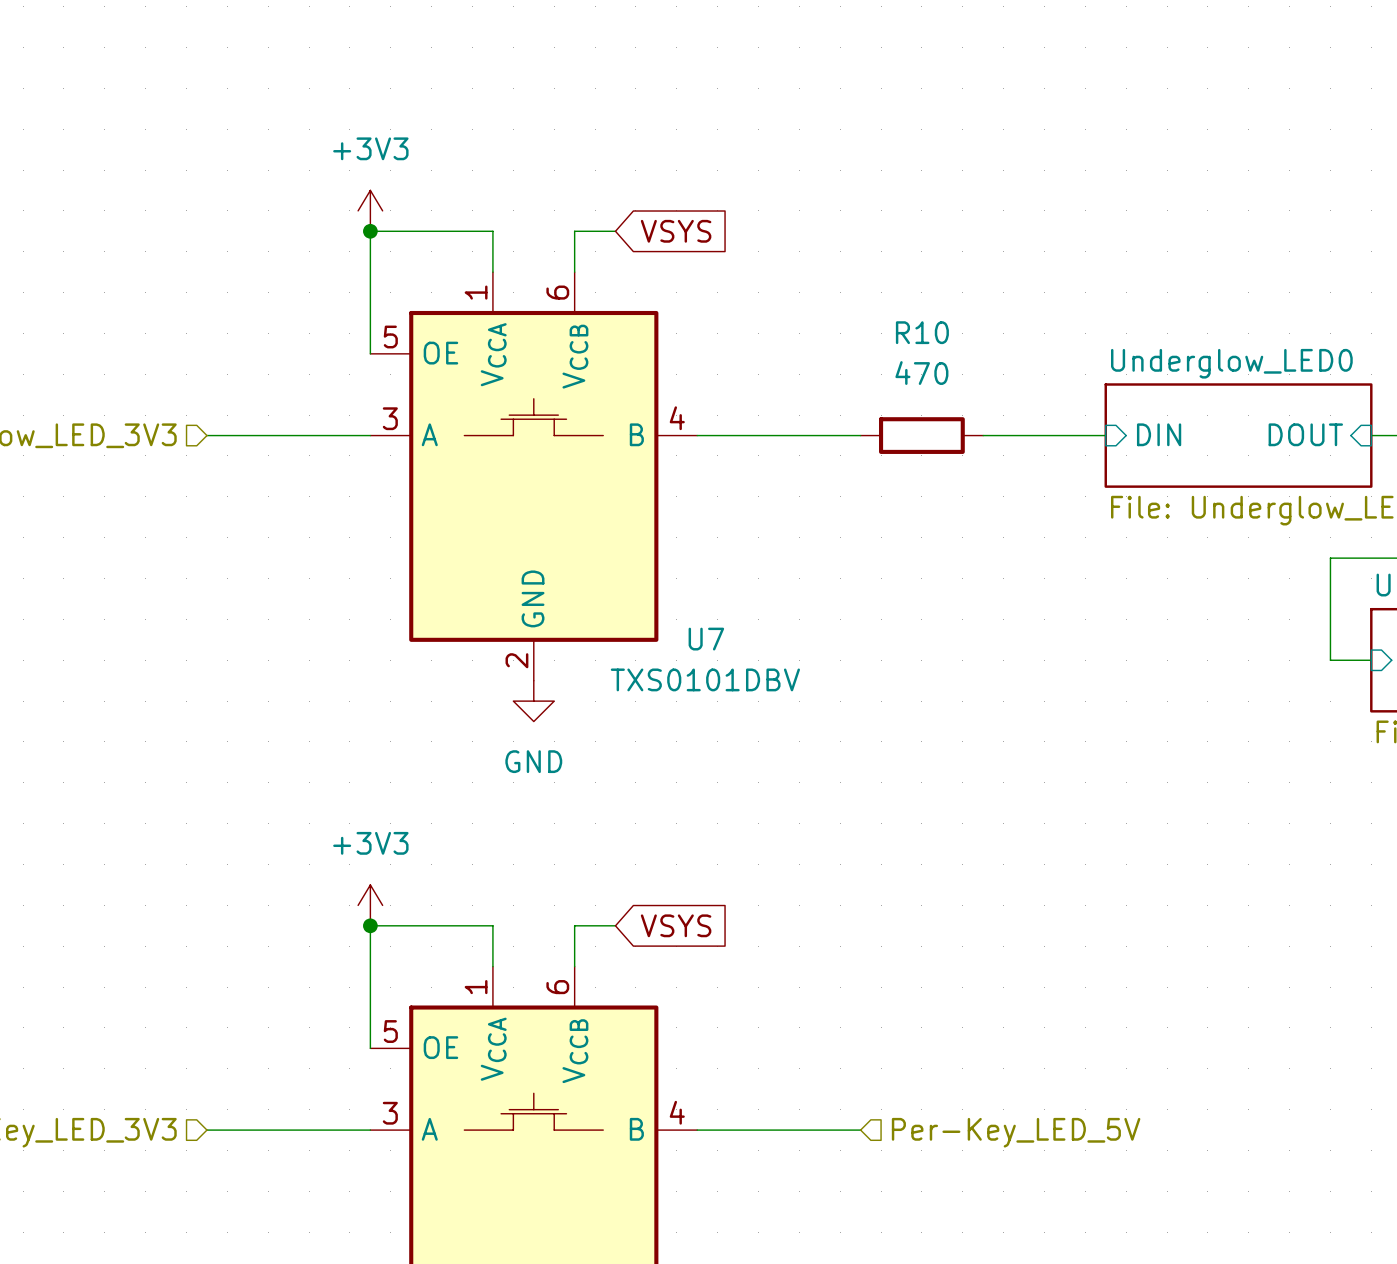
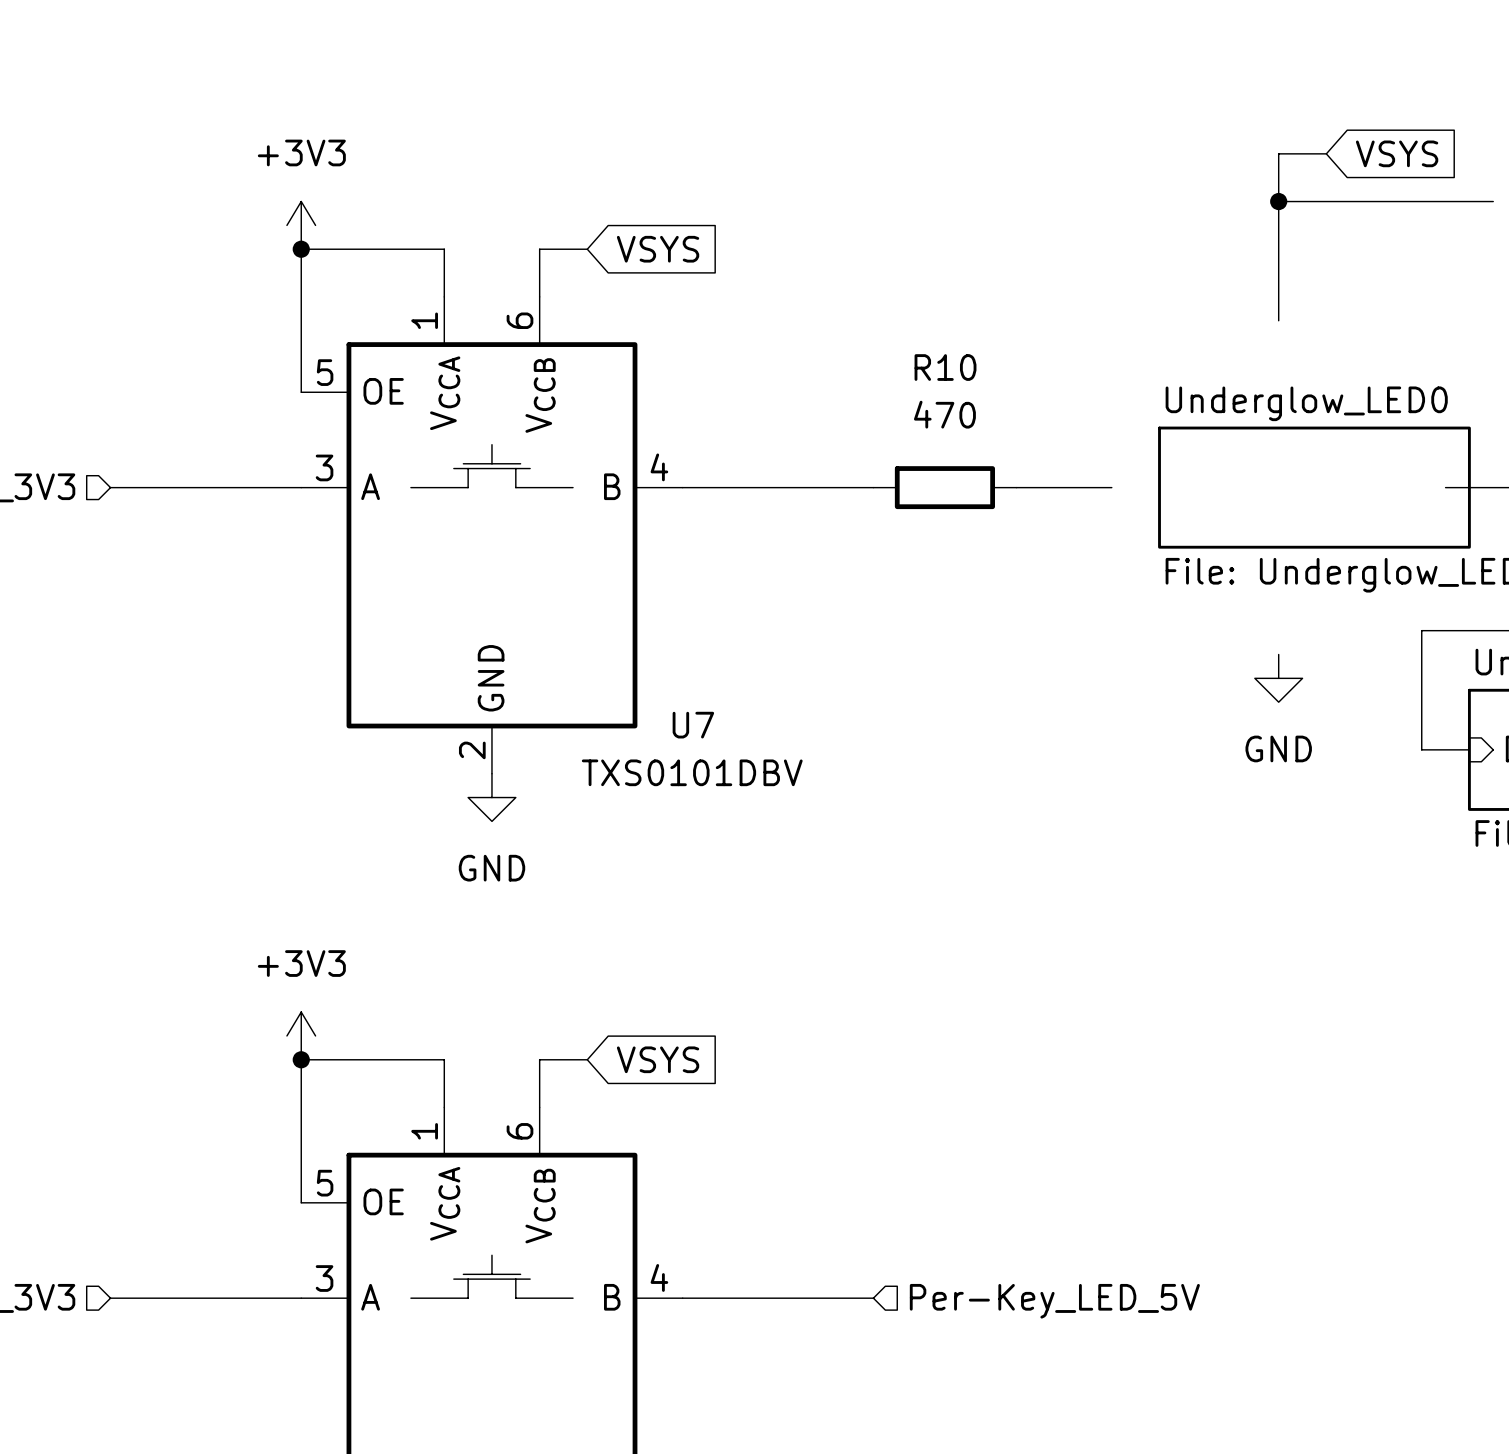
wire: none -> (1326, 153) (1278, 153) (1278, 320)
global label: none -> VSYS (1397, 153)
wire: none -> (1278, 201) (1493, 201)
junction: none -> (1278, 201)
sheet pin: DIN (1159, 434) -> none
sheet pin: DOUT (1305, 434) -> none
wire: (1064, 435) (1105, 435) -> none
wire: none -> (1445, 487) (1469, 487)
power symbol: none -> GND (1278, 678)

